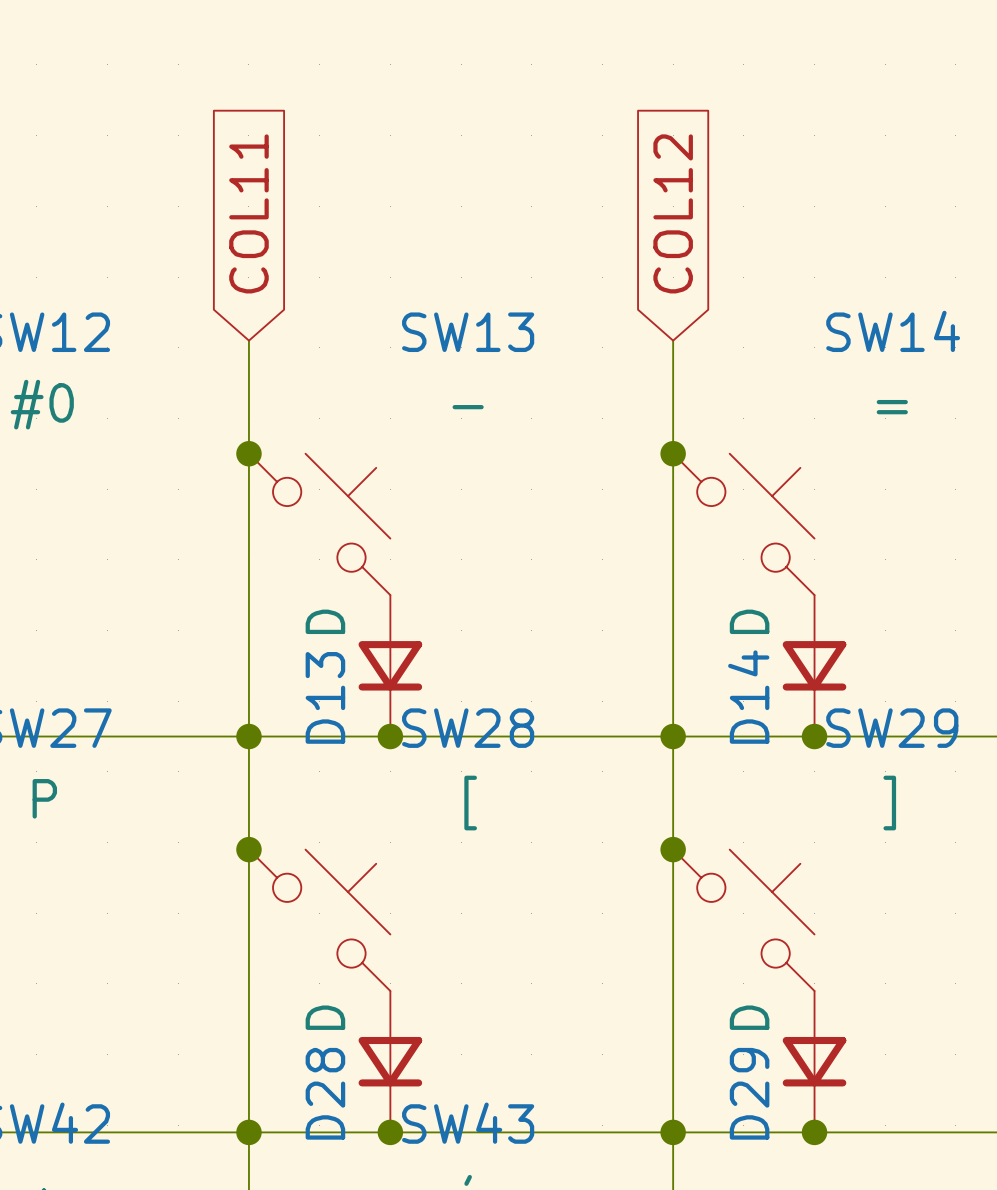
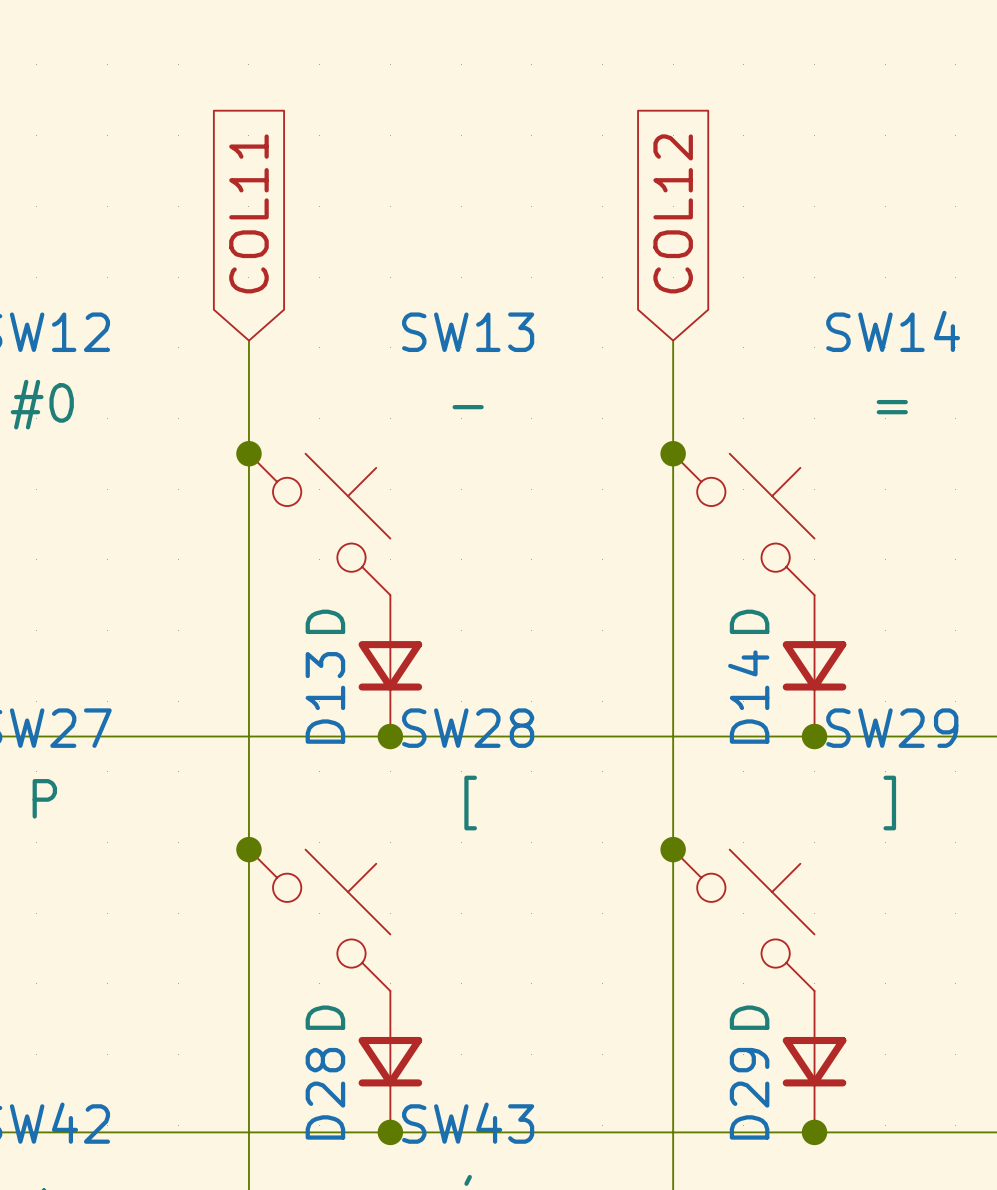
junction: (248, 736) -> none
junction: (673, 736) -> none
junction: (248, 1132) -> none
junction: (673, 1132) -> none

